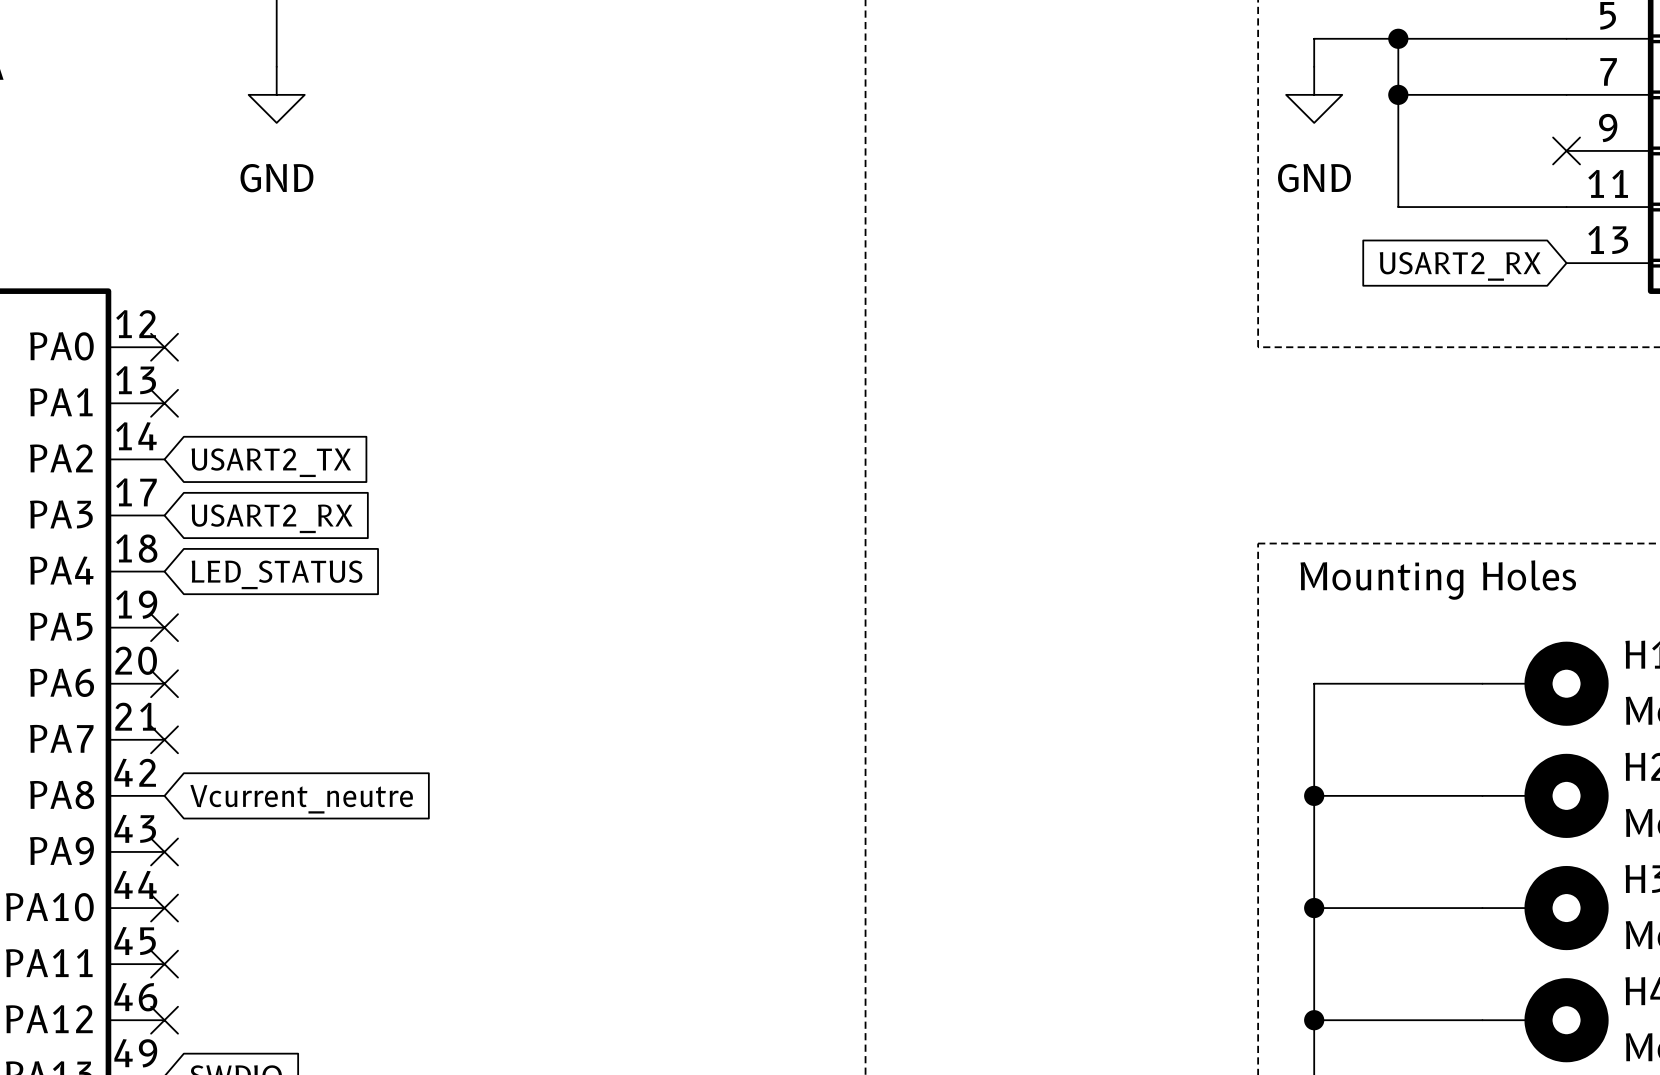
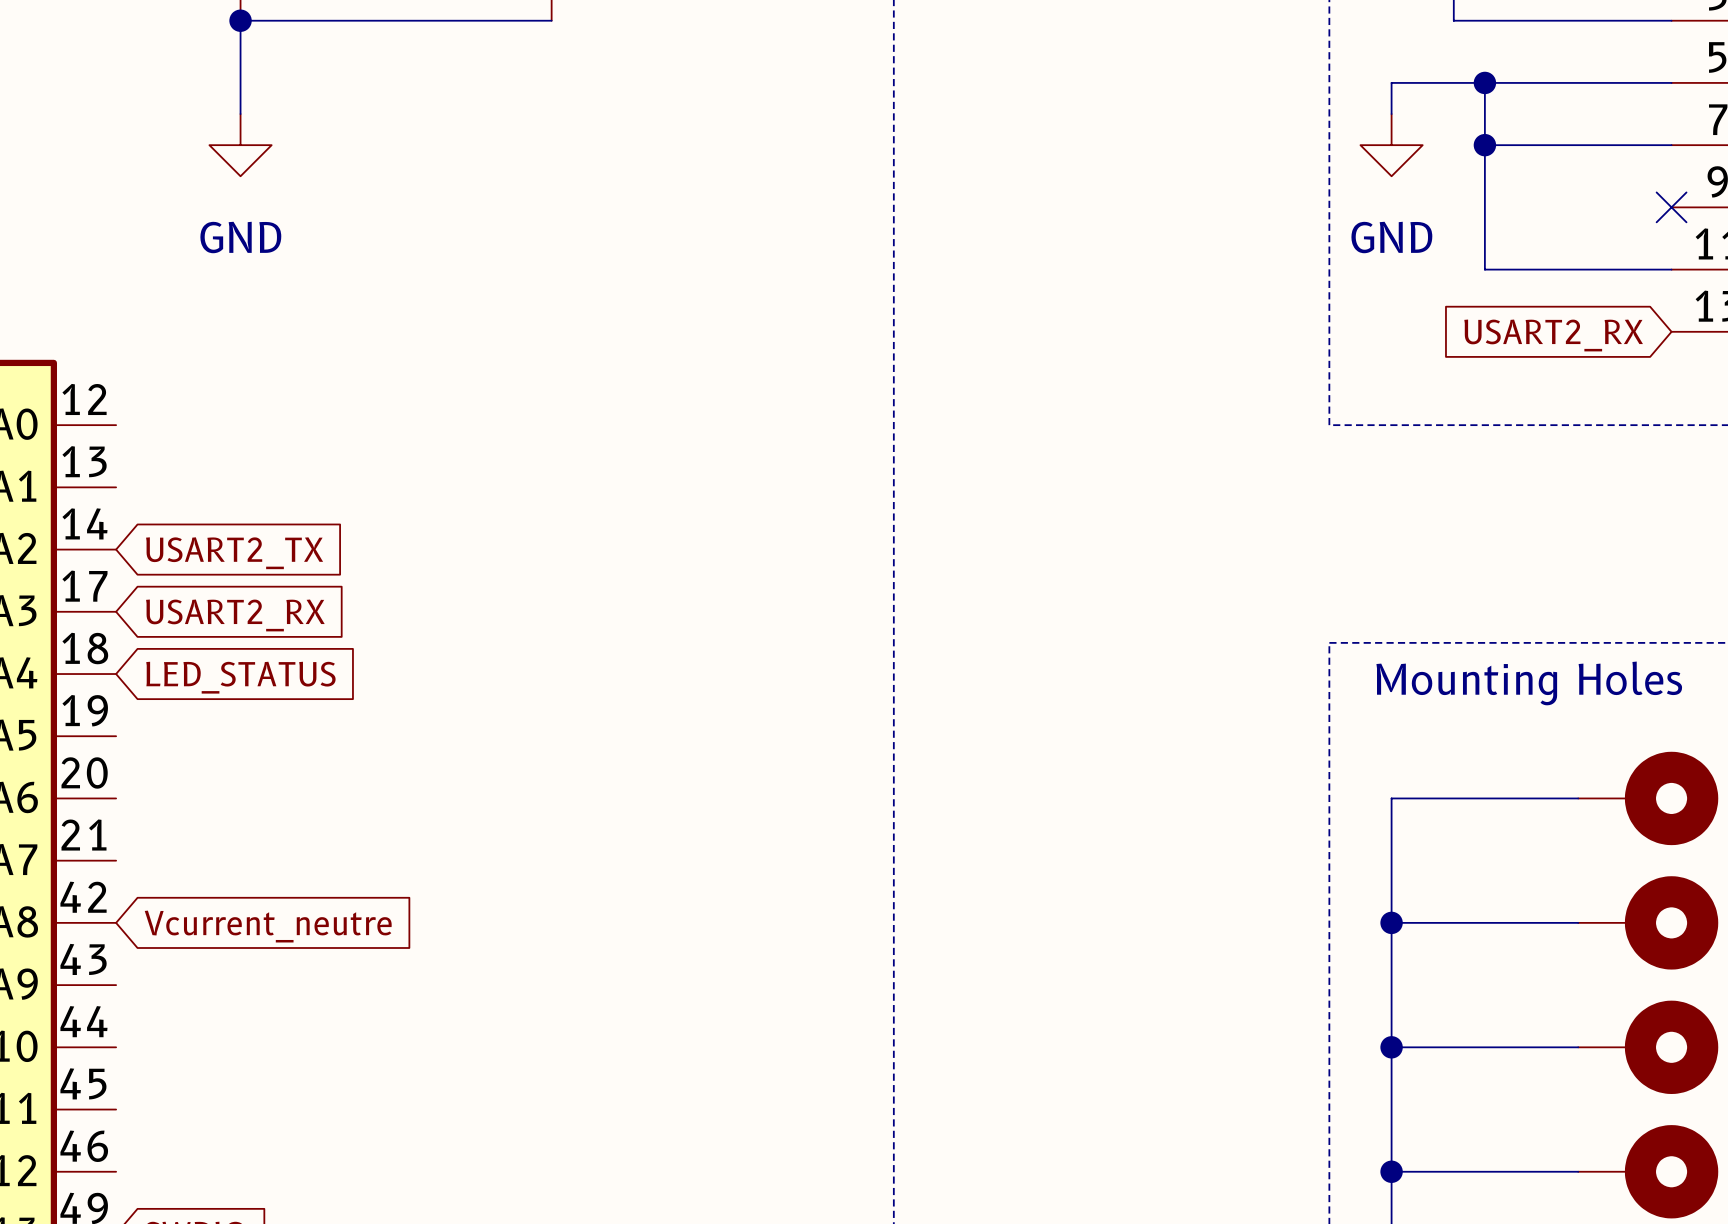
no-connect mark: (164, 347) -> none
no-connect mark: (164, 403) -> none
no-connect mark: (164, 627) -> none
no-connect mark: (164, 683) -> none
no-connect mark: (164, 739) -> none
no-connect mark: (164, 851) -> none
no-connect mark: (164, 908) -> none
no-connect mark: (164, 964) -> none
no-connect mark: (164, 1020) -> none

